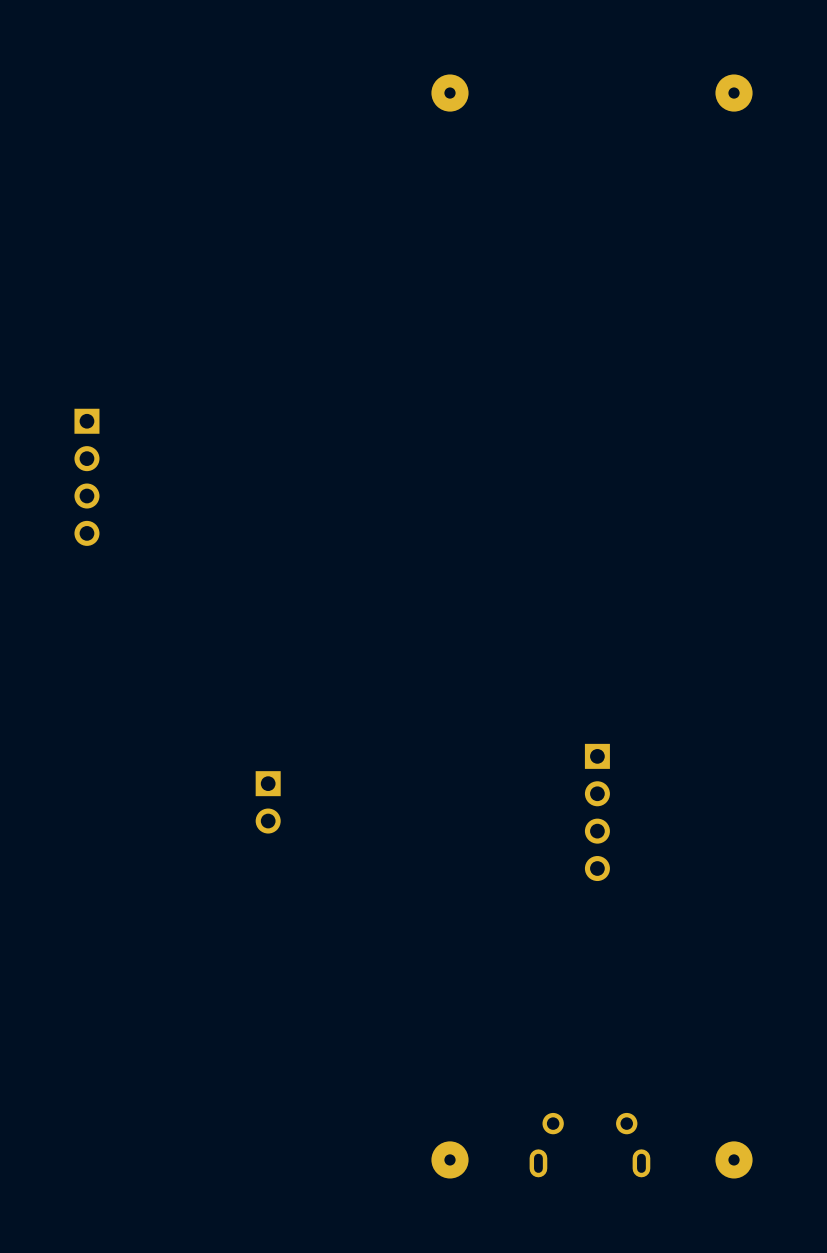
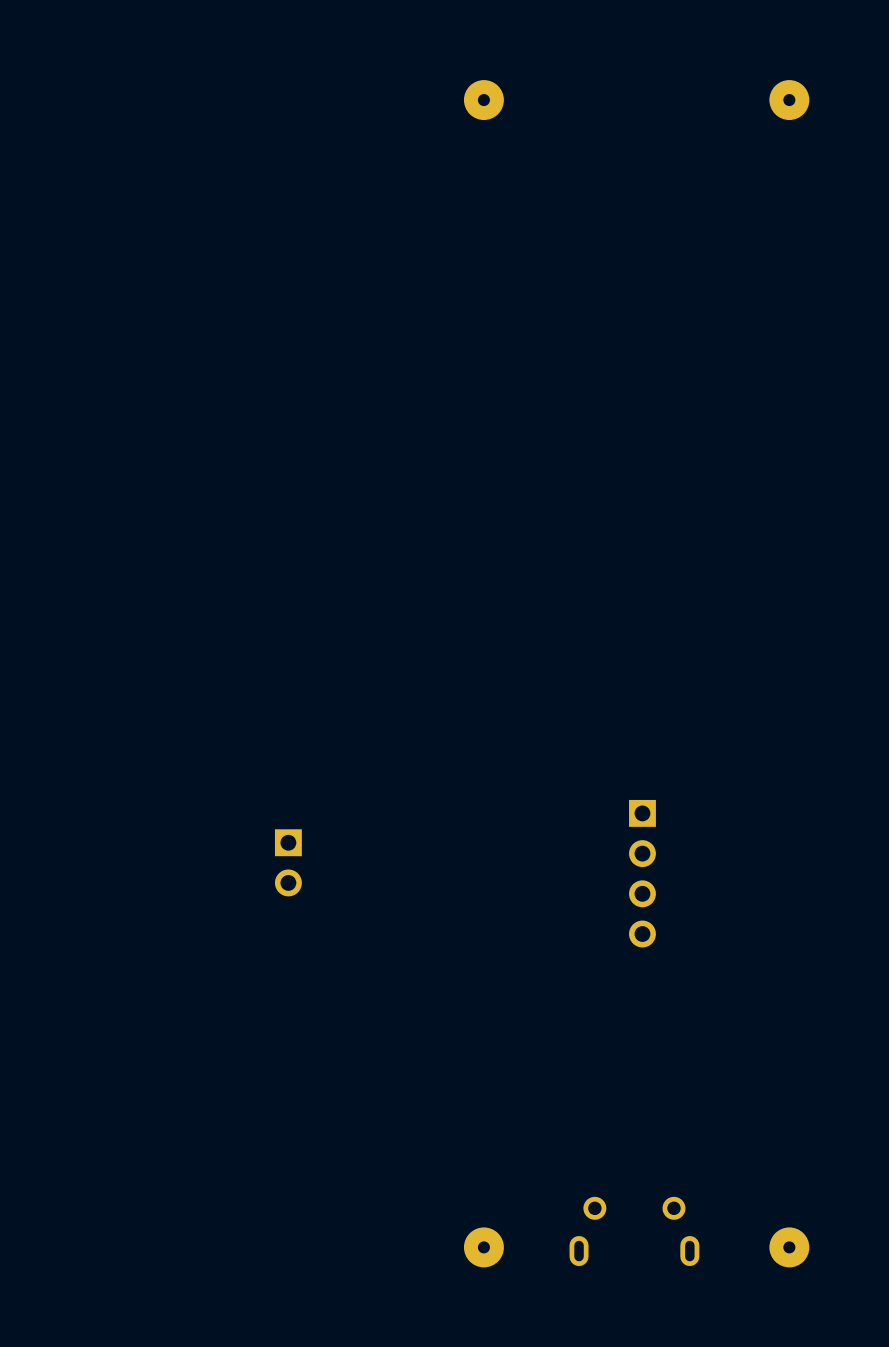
part: (86, 477) -> none

